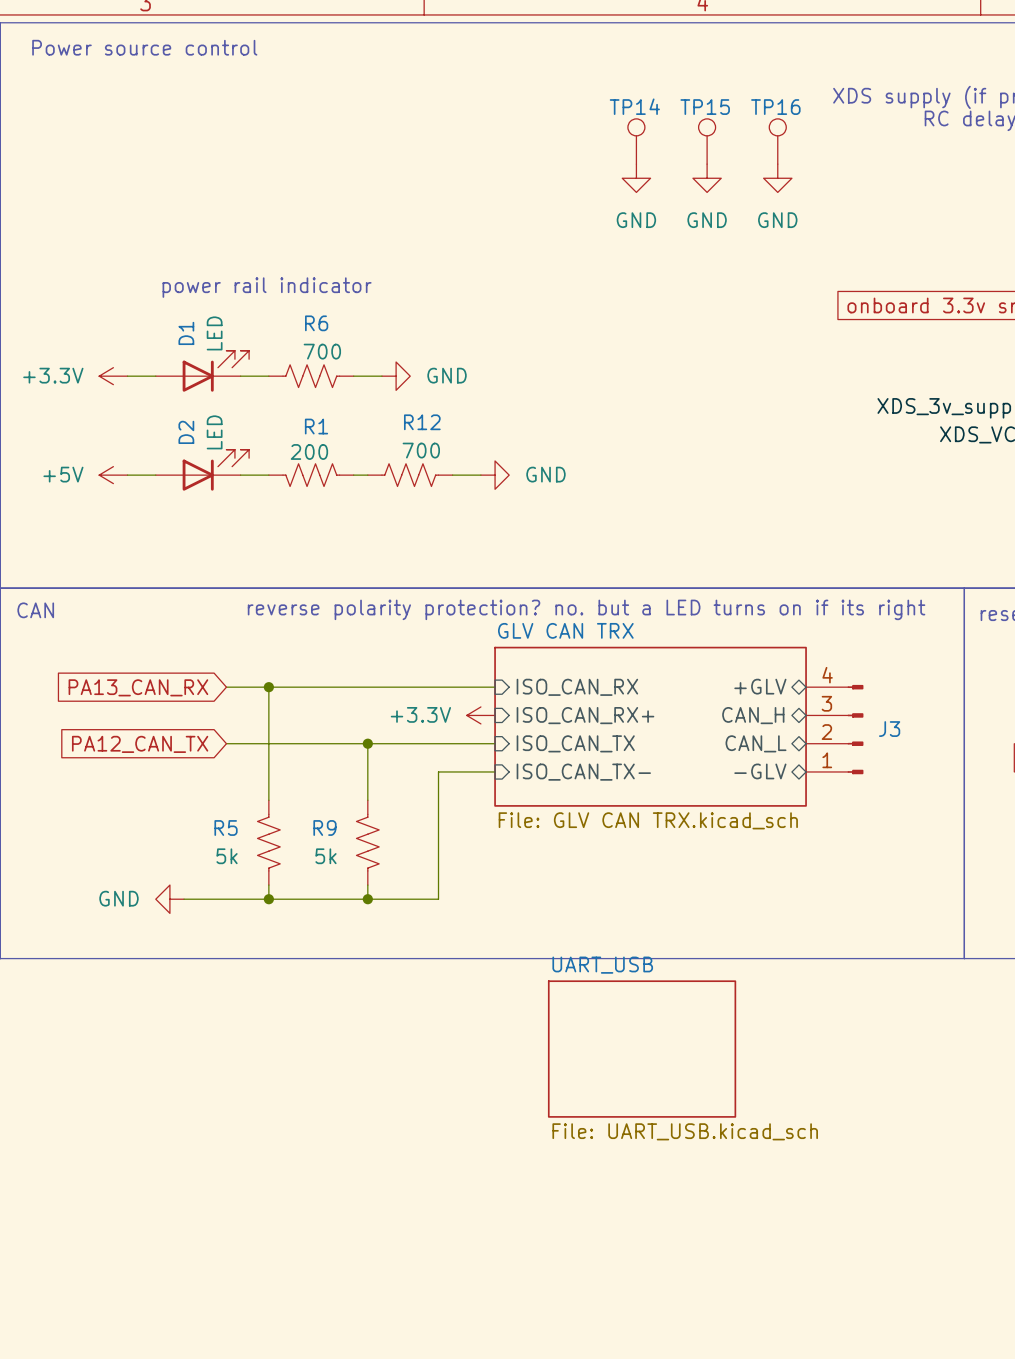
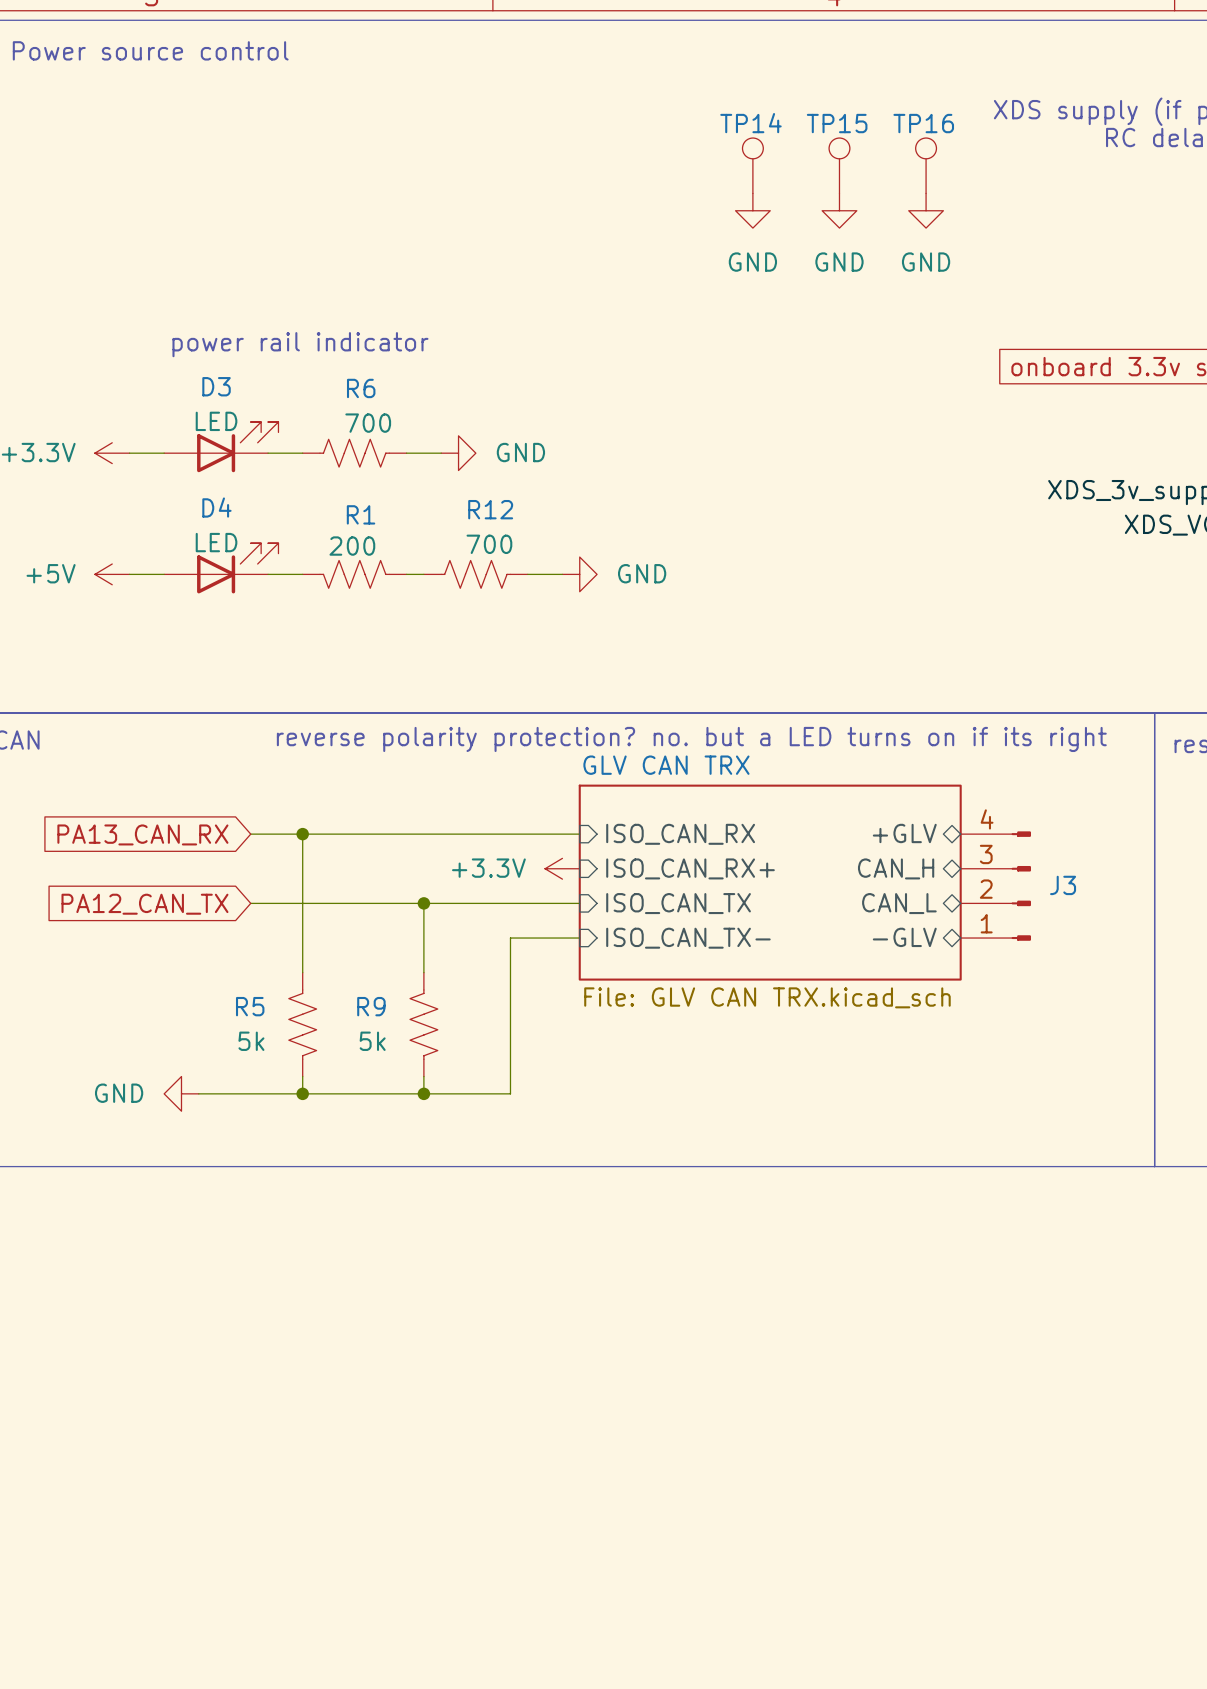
D1 name: D1 (186, 333) -> D3 (216, 386)
D1 value rotation: 0° (214, 333) -> 90° clockwise (216, 421)
D2 name: D2 (186, 432) -> D4 (216, 507)
D2 value rotation: 0° (214, 432) -> 90° clockwise (216, 542)
sheet UART_USB: File: UART_USB.kicad_sch (642, 1049) -> none

